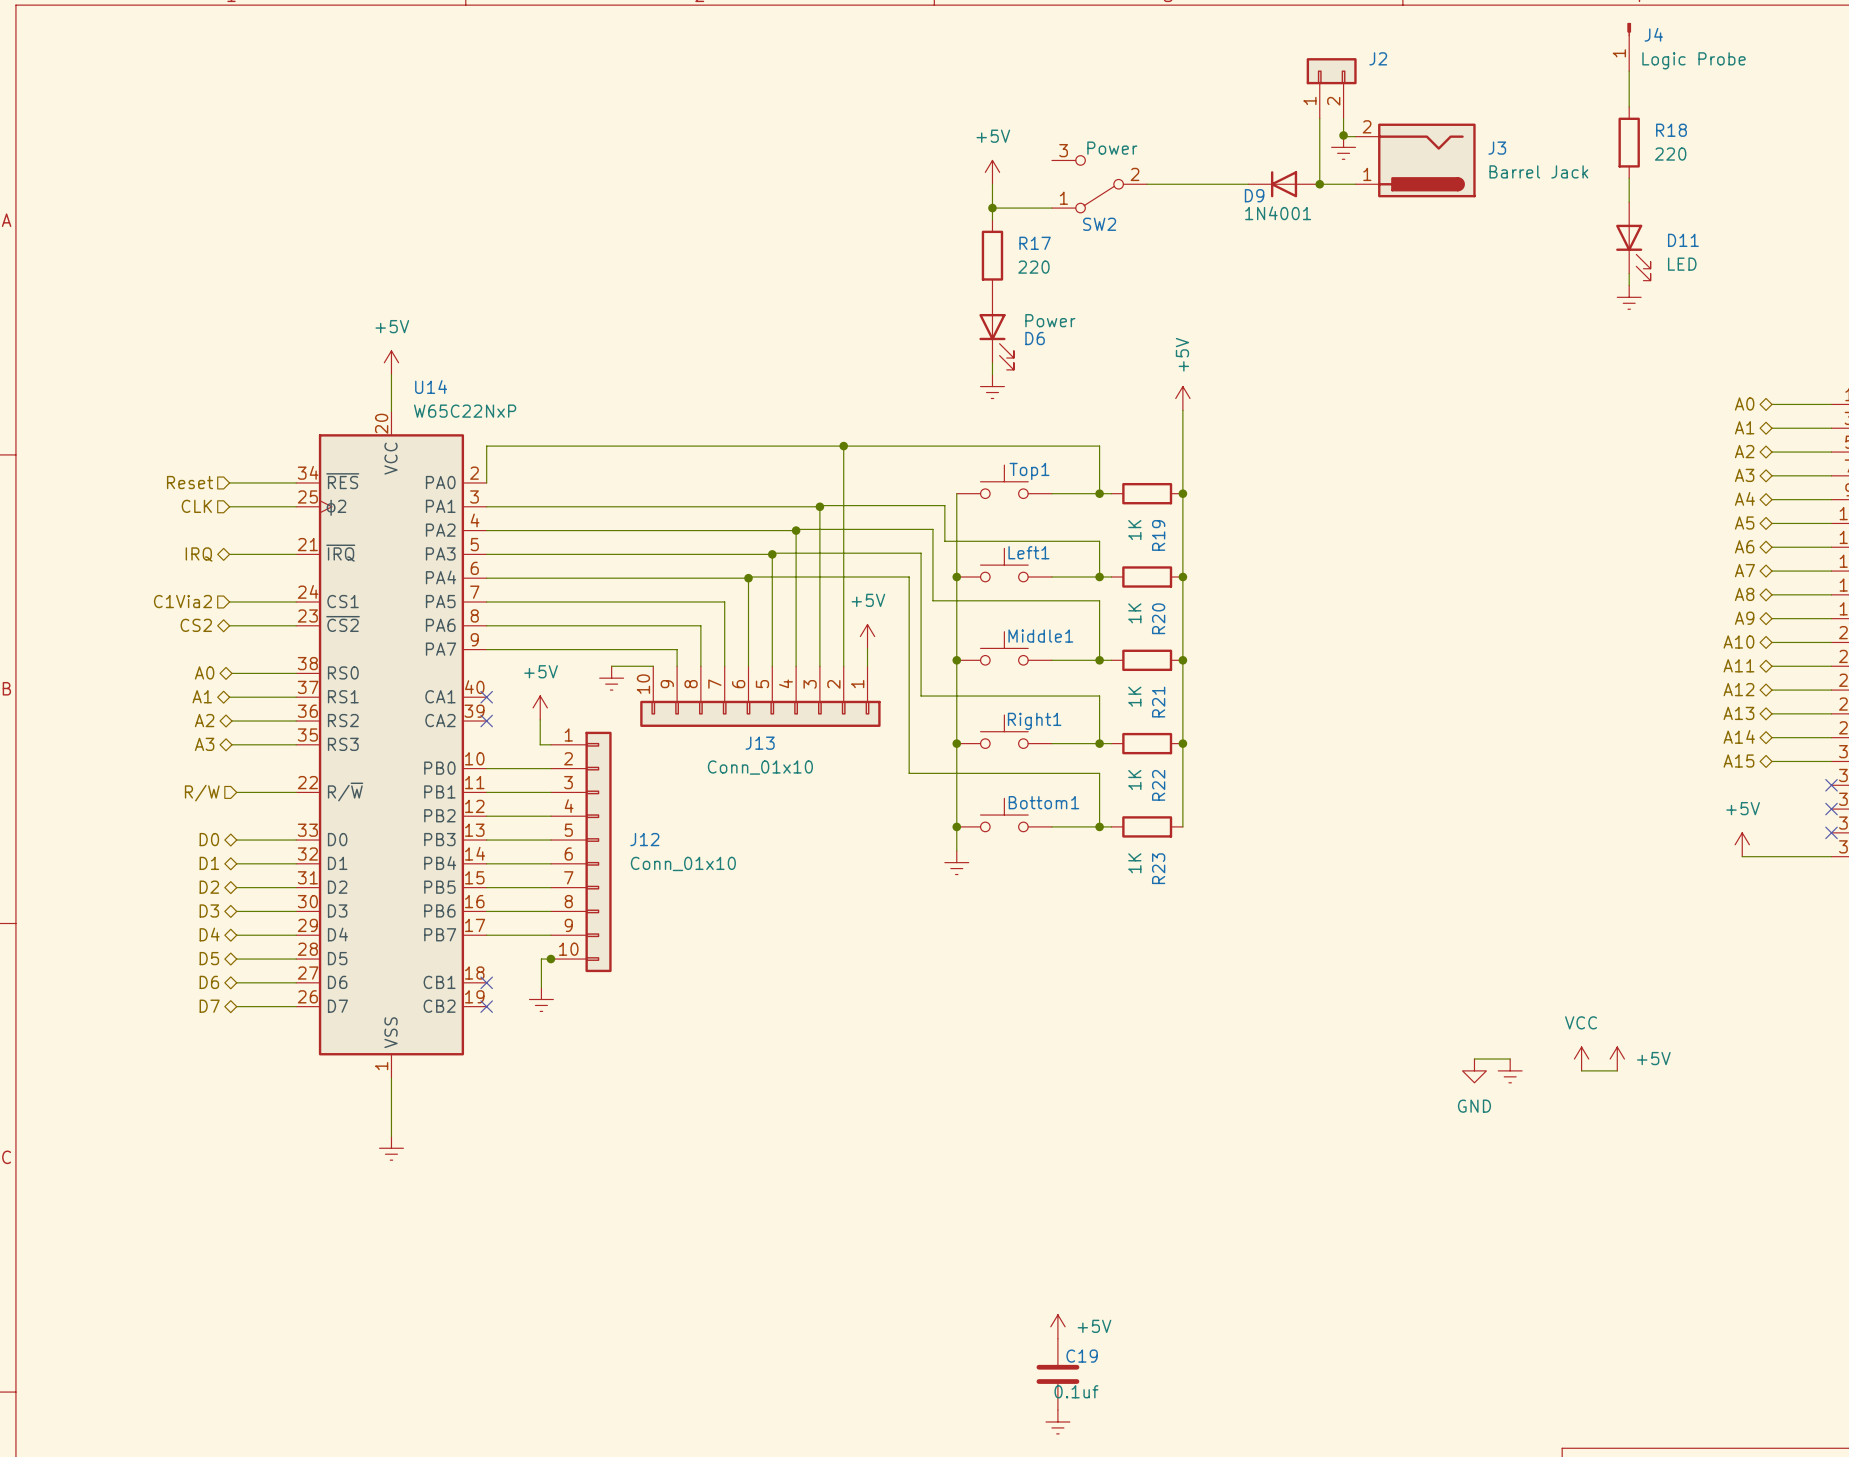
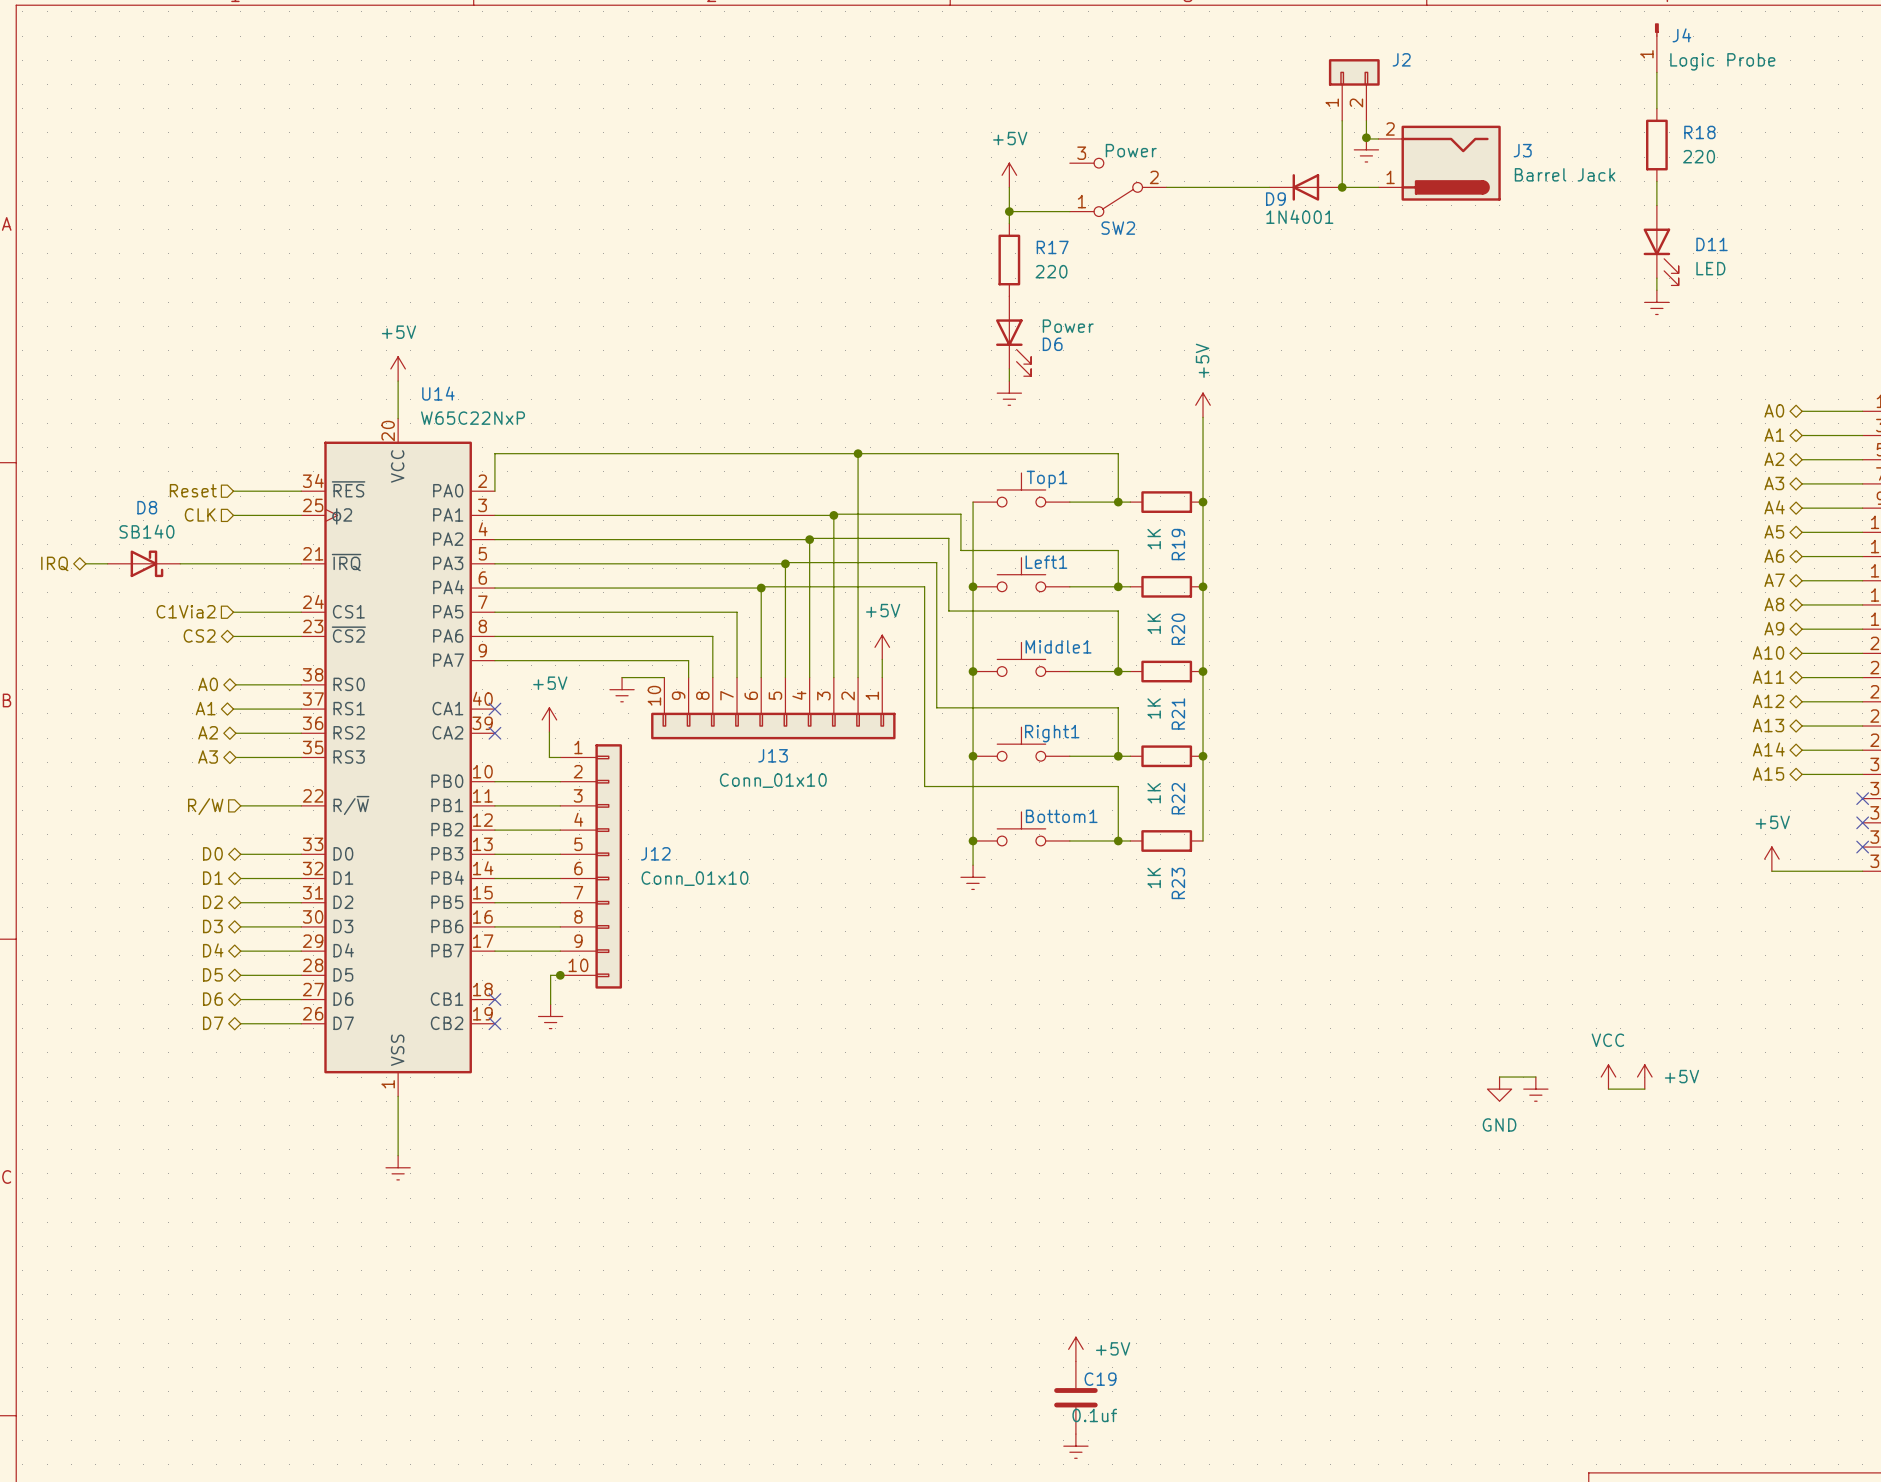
wire: none -> (85, 563) (107, 563)
D8: none -> SB140 (143, 563)
wire: none -> (180, 563) (233, 563)
hierarchical label position: IRQ (199, 554) -> IRQ (54, 563)

